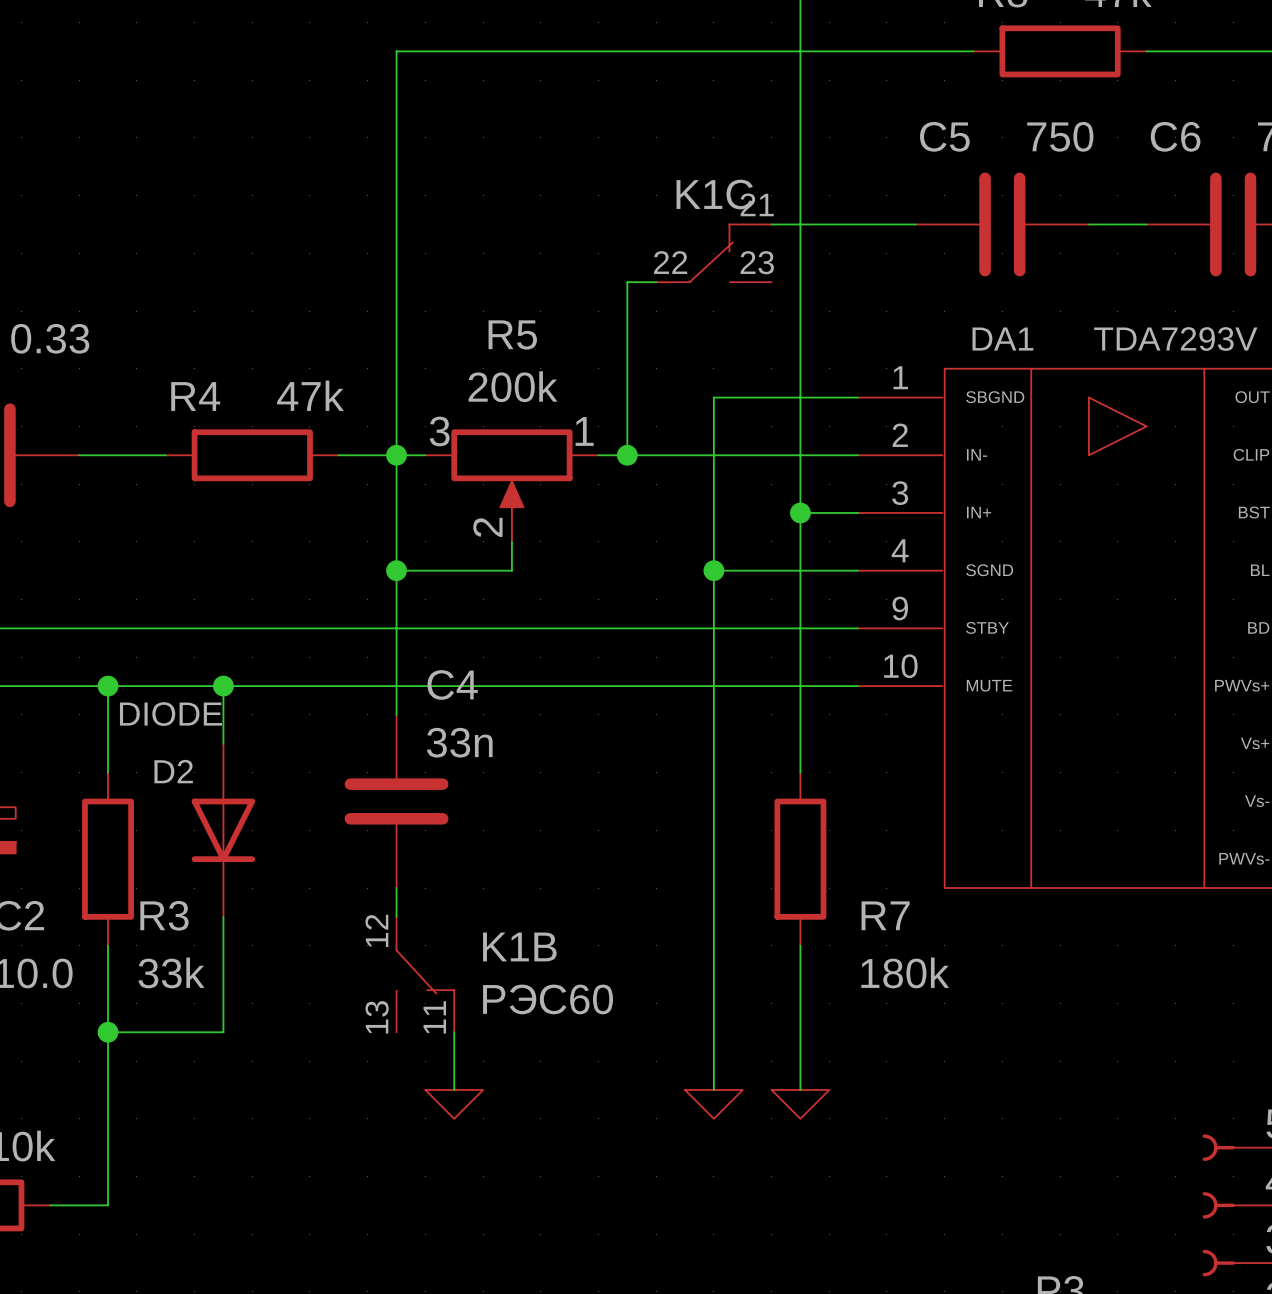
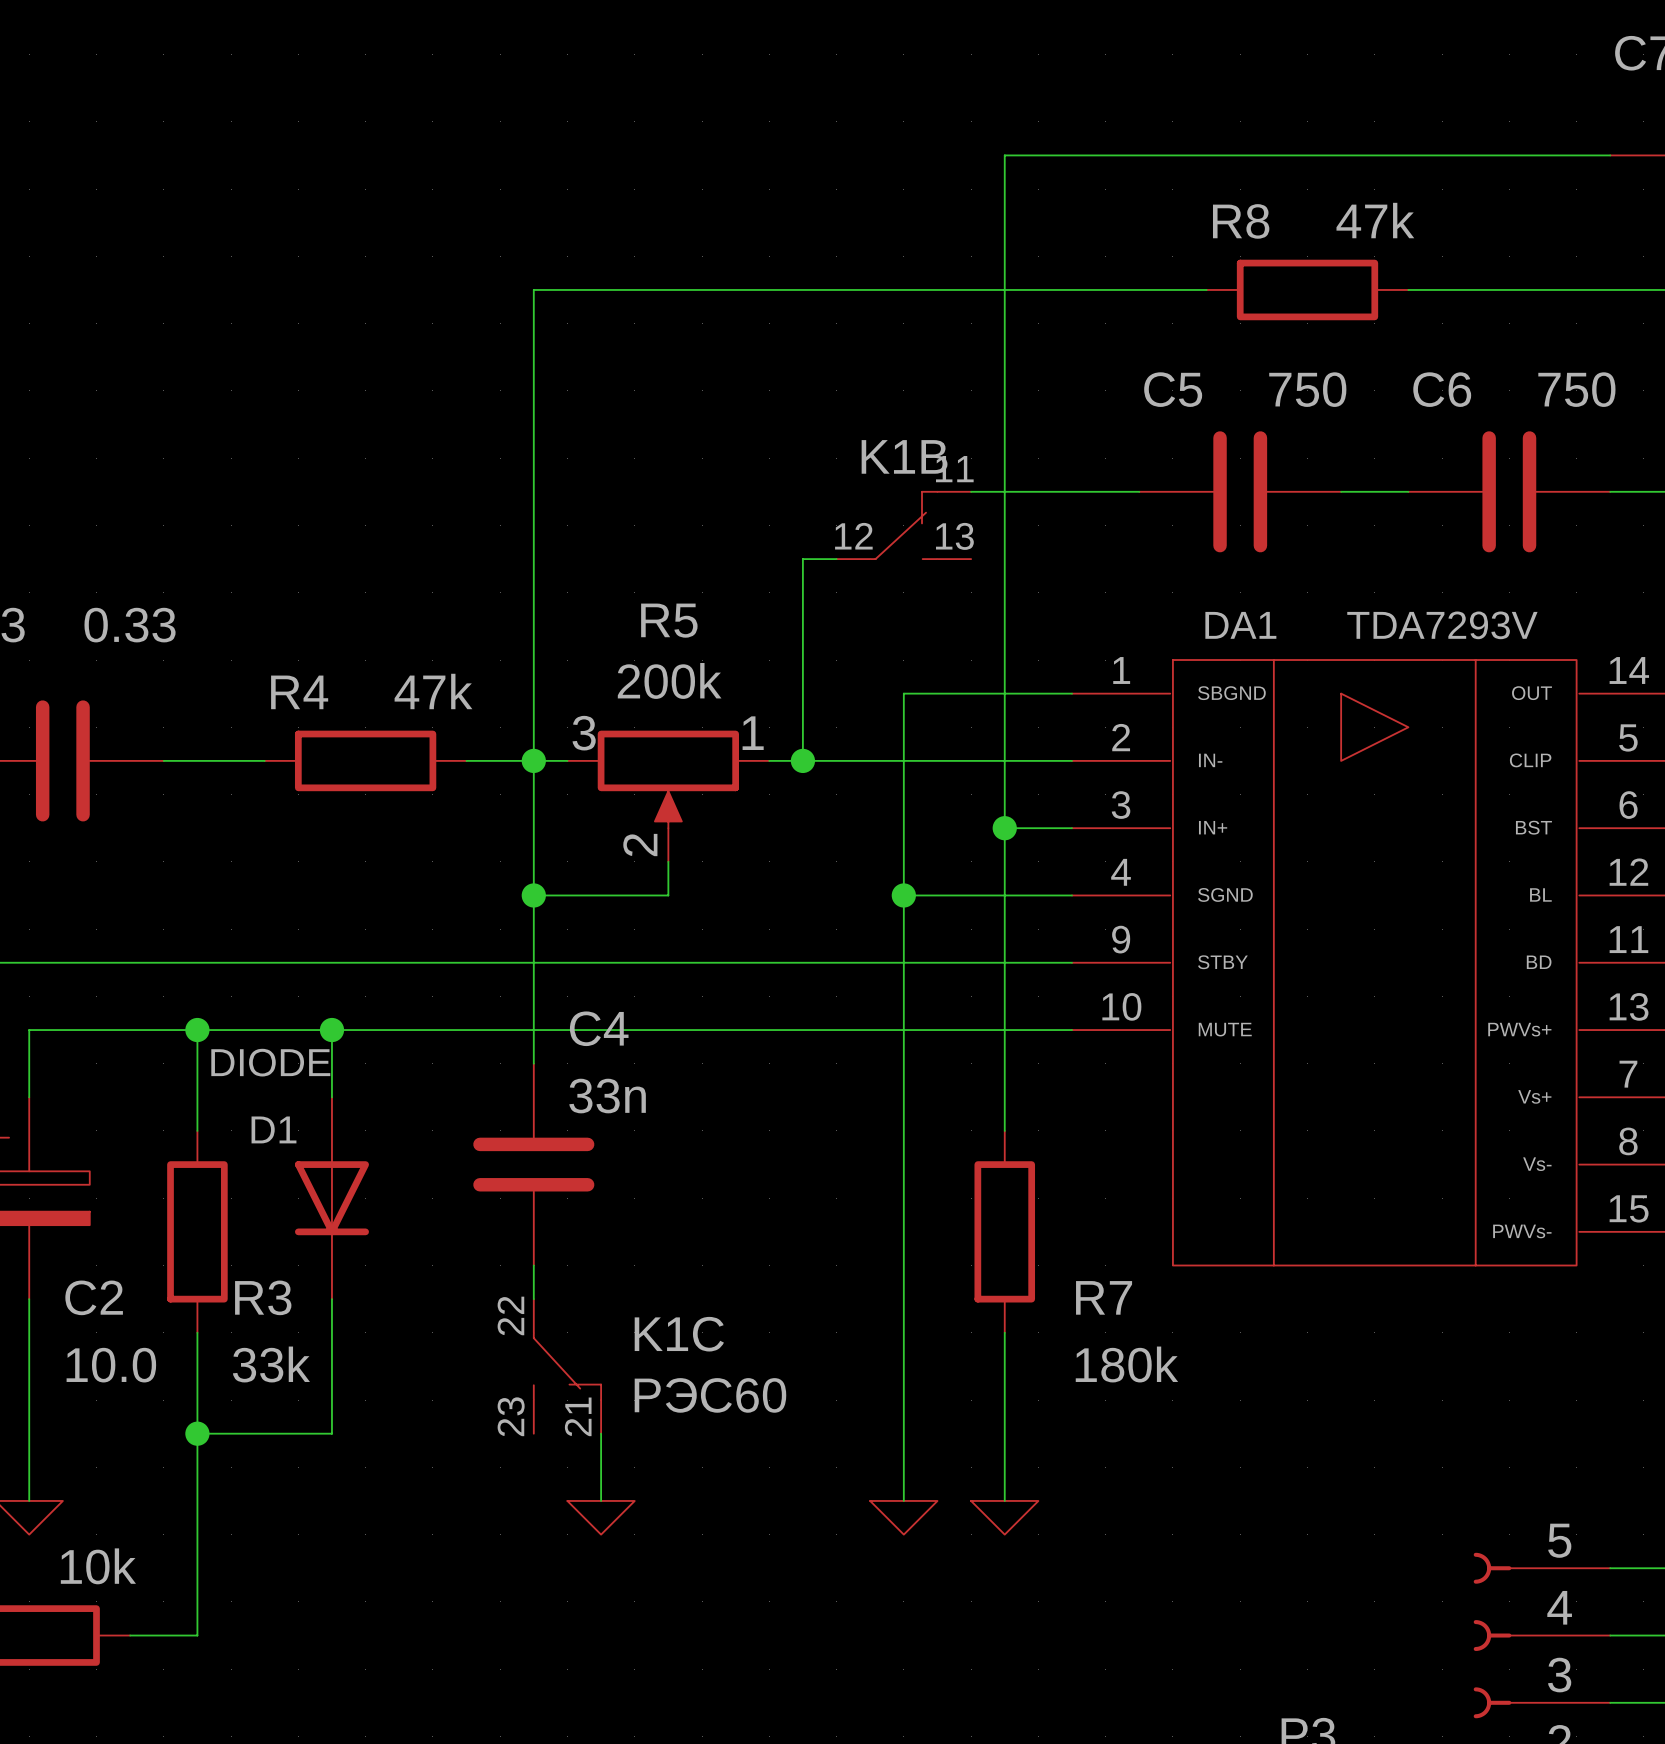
K1C name position: K1C (714, 194) -> K1C (679, 1334)
K1C position: (713, 253) -> (567, 1366)
K1C rotation: 0° (714, 253) -> 90° clockwise (567, 1366)
D2 name: D2 (173, 771) -> D1 (273, 1129)
K1B name position: K1B (519, 946) -> K1B (904, 456)
K1B rotation: 0° (425, 974) -> 90° counterclockwise (904, 525)
K1B position: (425, 974) -> (903, 525)

